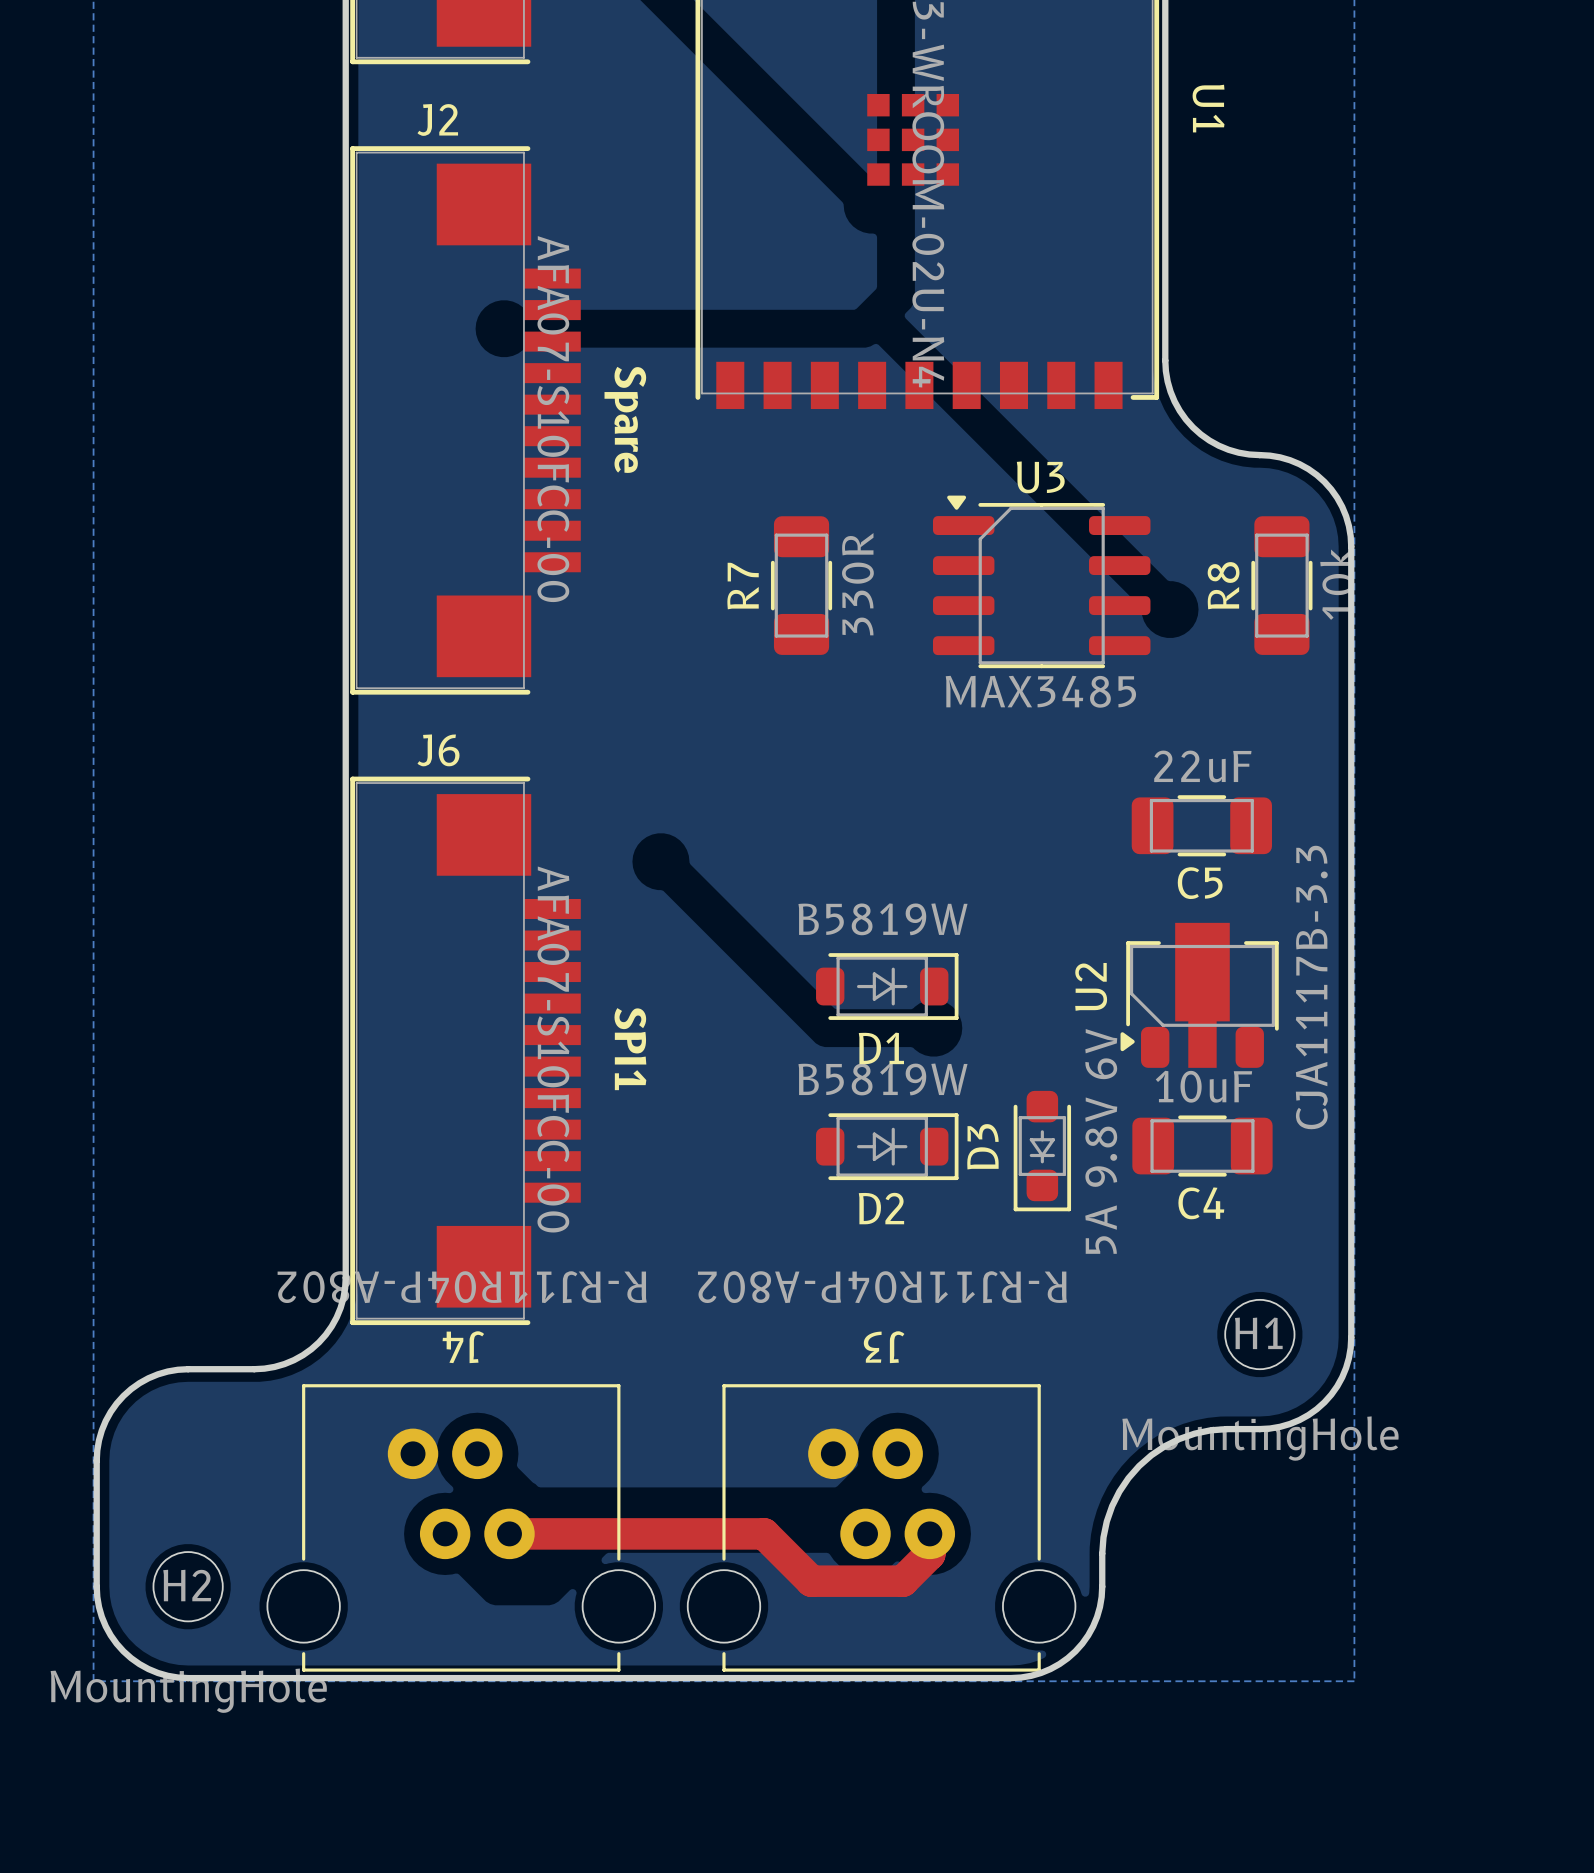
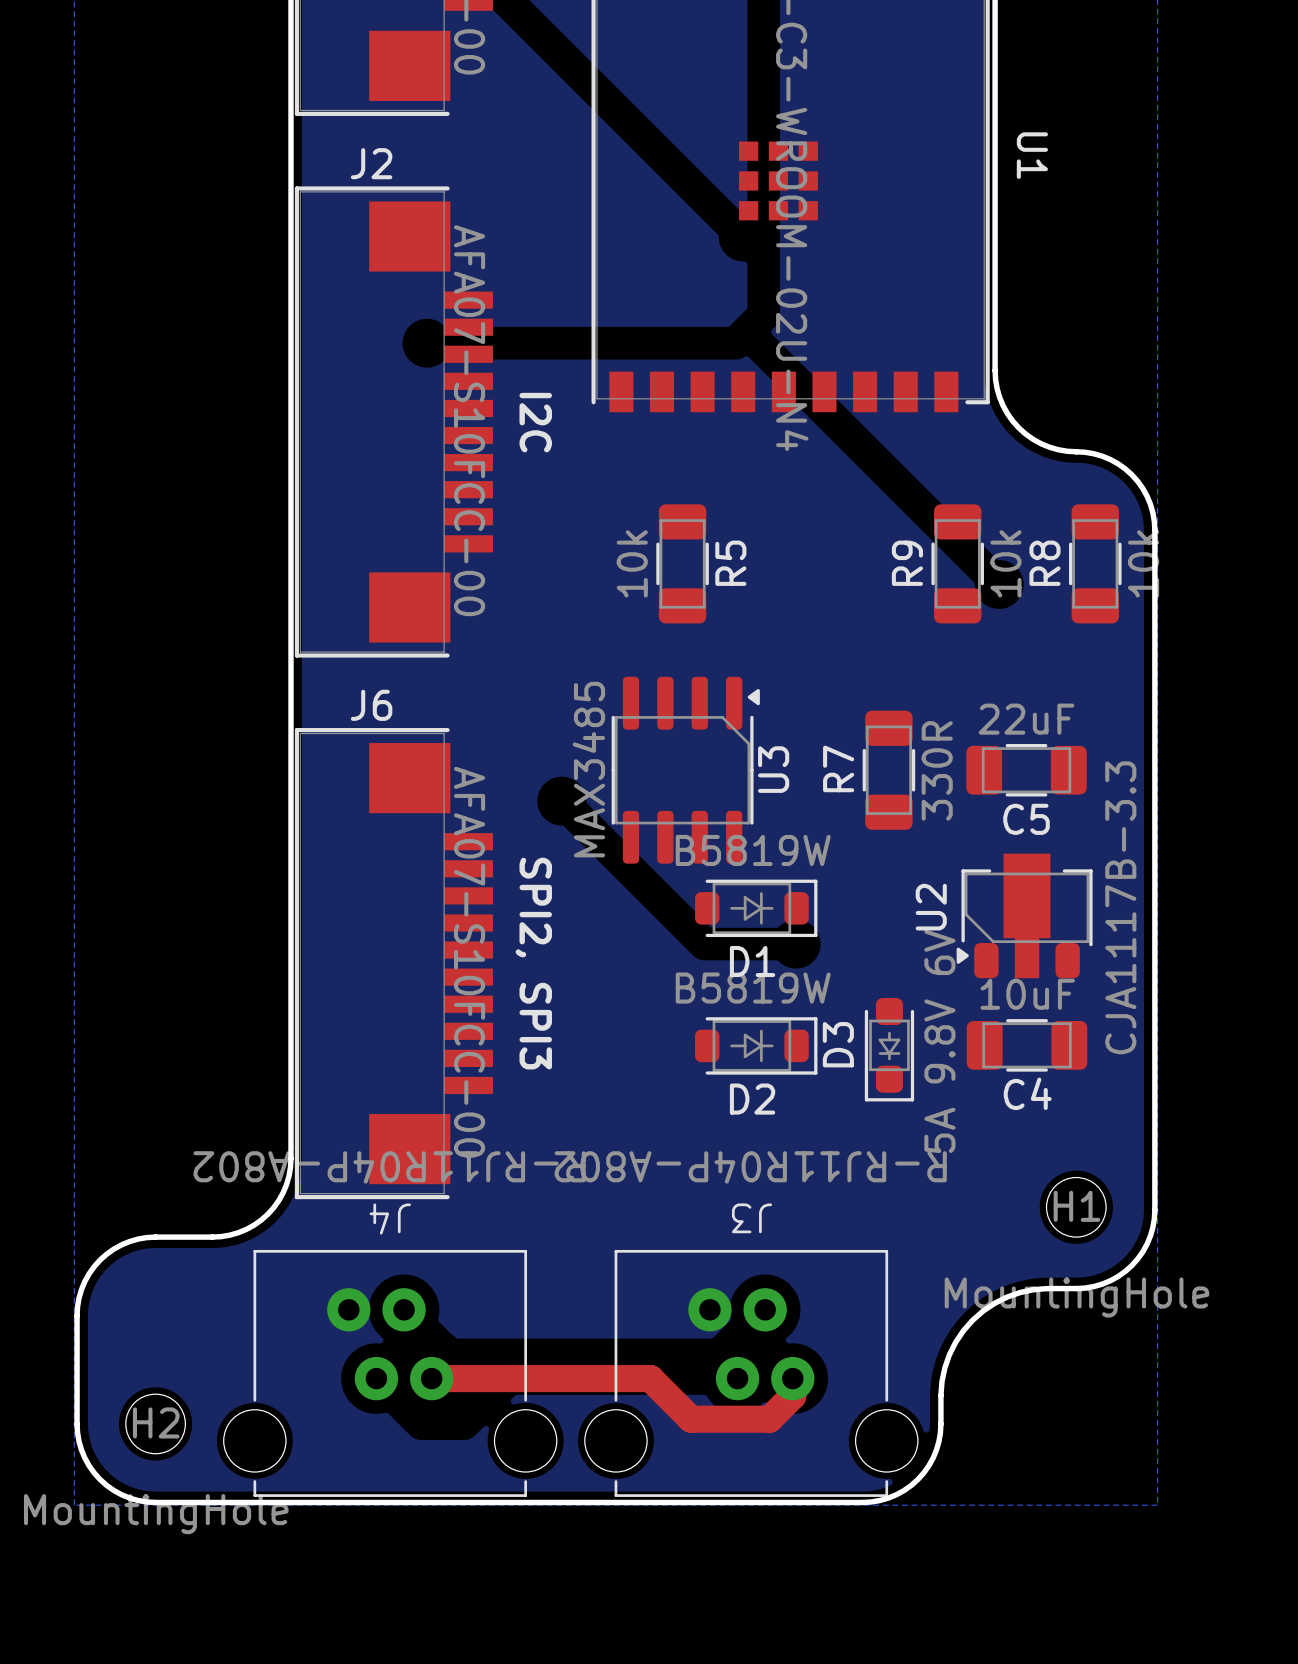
text: Spare (625, 419) -> I2C (535, 422)
U3 rotation: 0° (1041, 581) -> 90° clockwise (685, 770)
U3 position: (1041, 581) -> (685, 770)
R7 value: 330R (857, 584) -> 10k (632, 563)
R9: none -> 10k (957, 563)
R7 name: R7 (743, 586) -> R5 (730, 563)
R7: none -> 330R (888, 770)
text: SPI1 (630, 1049) -> SPI2, SPI3 (533, 963)

